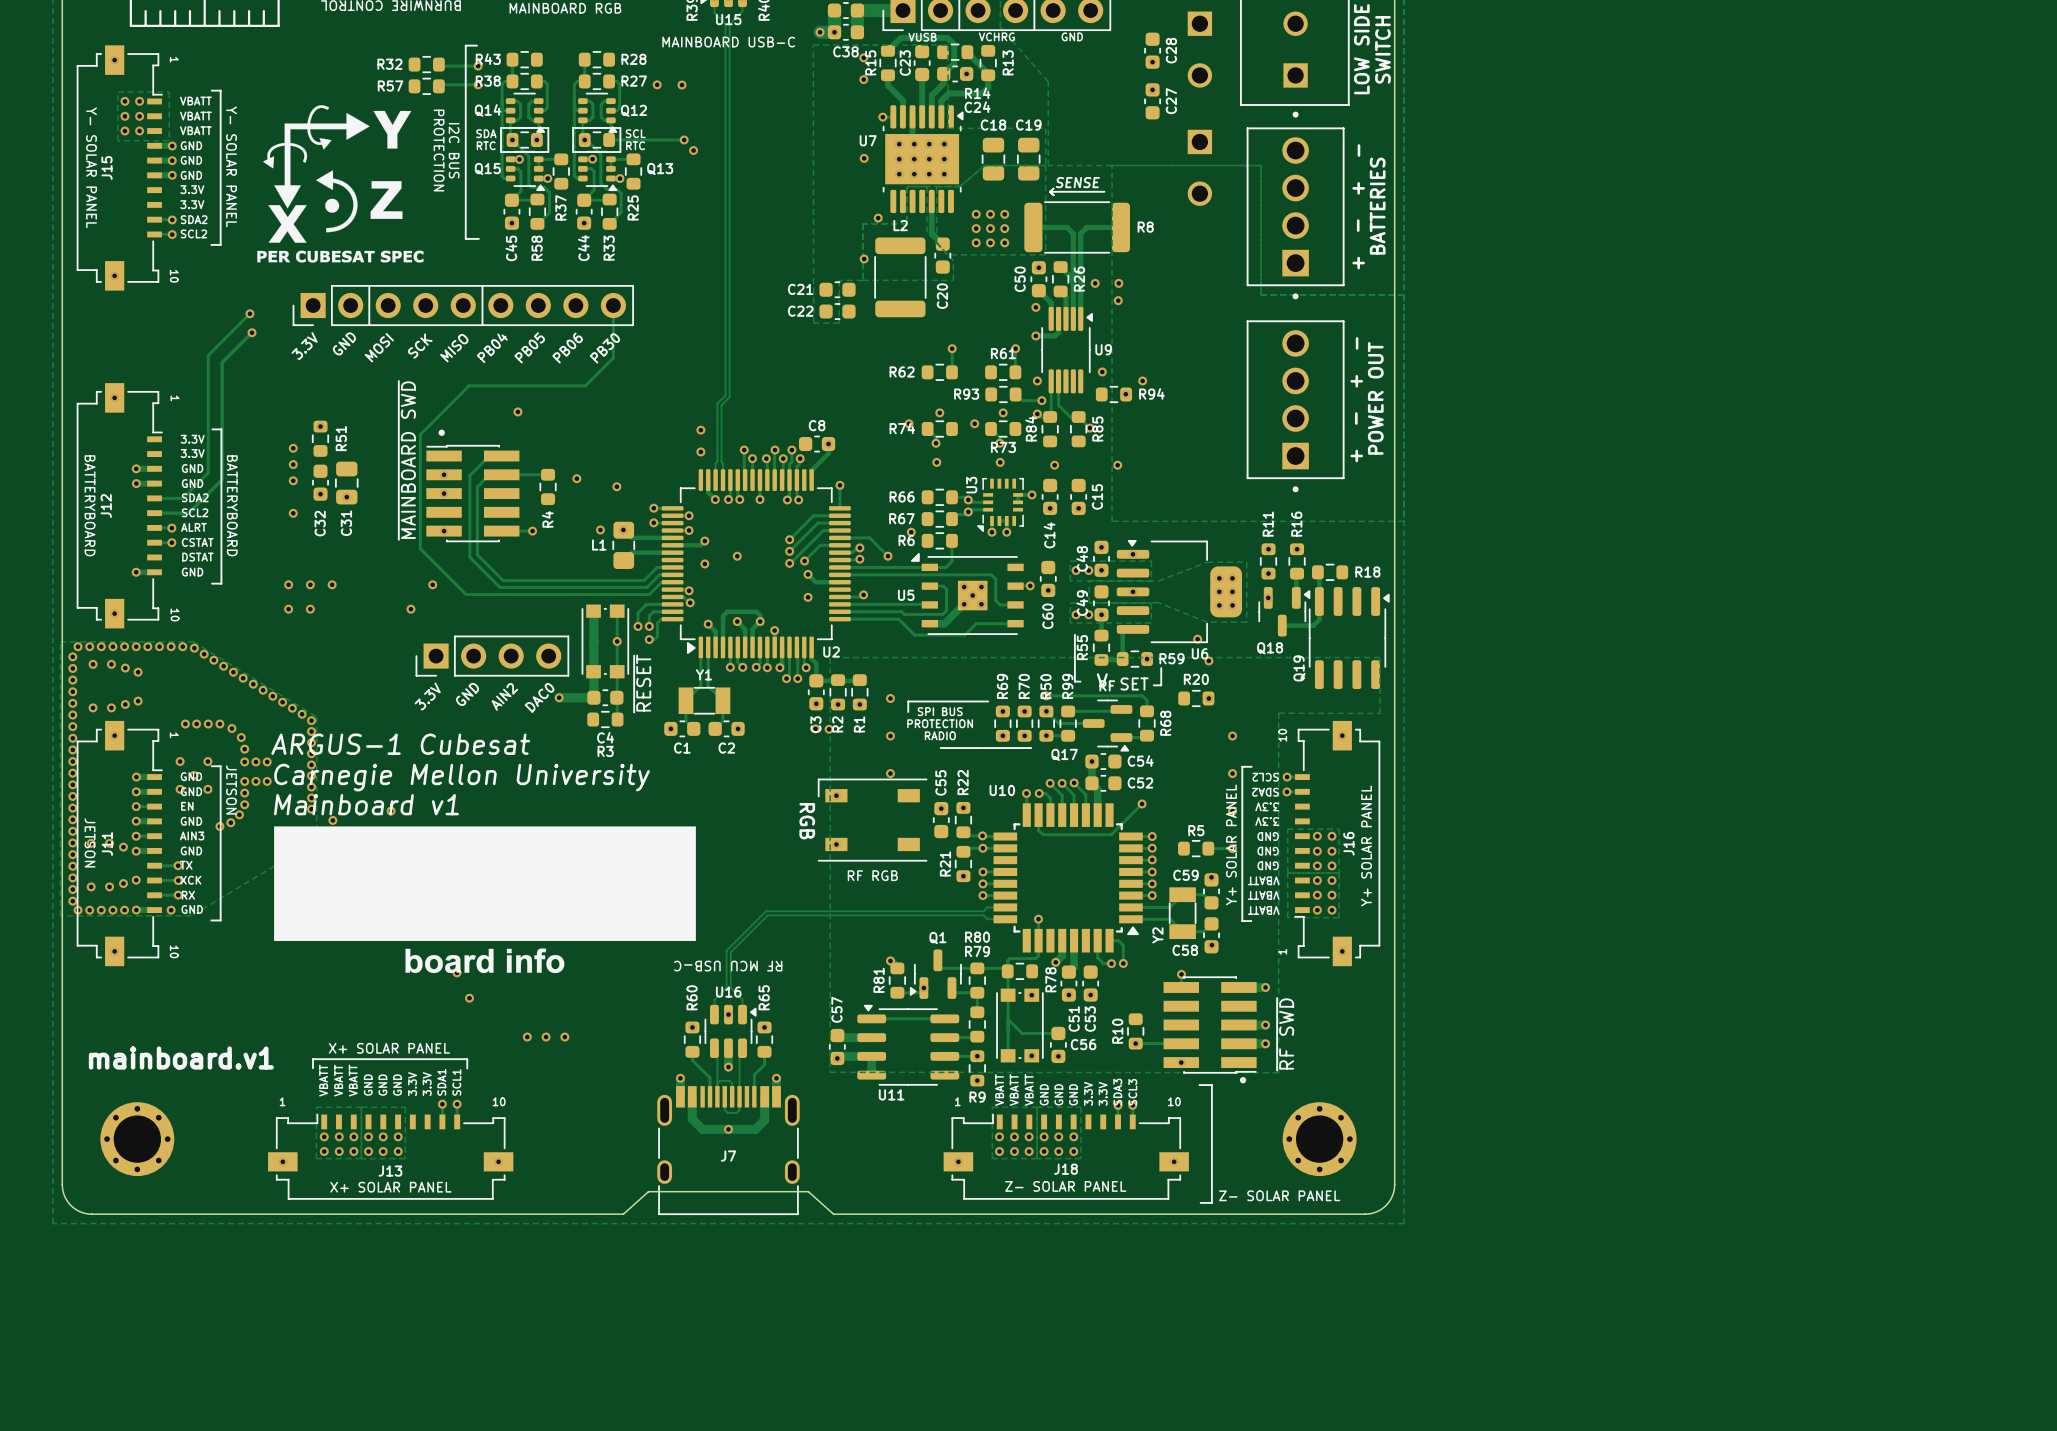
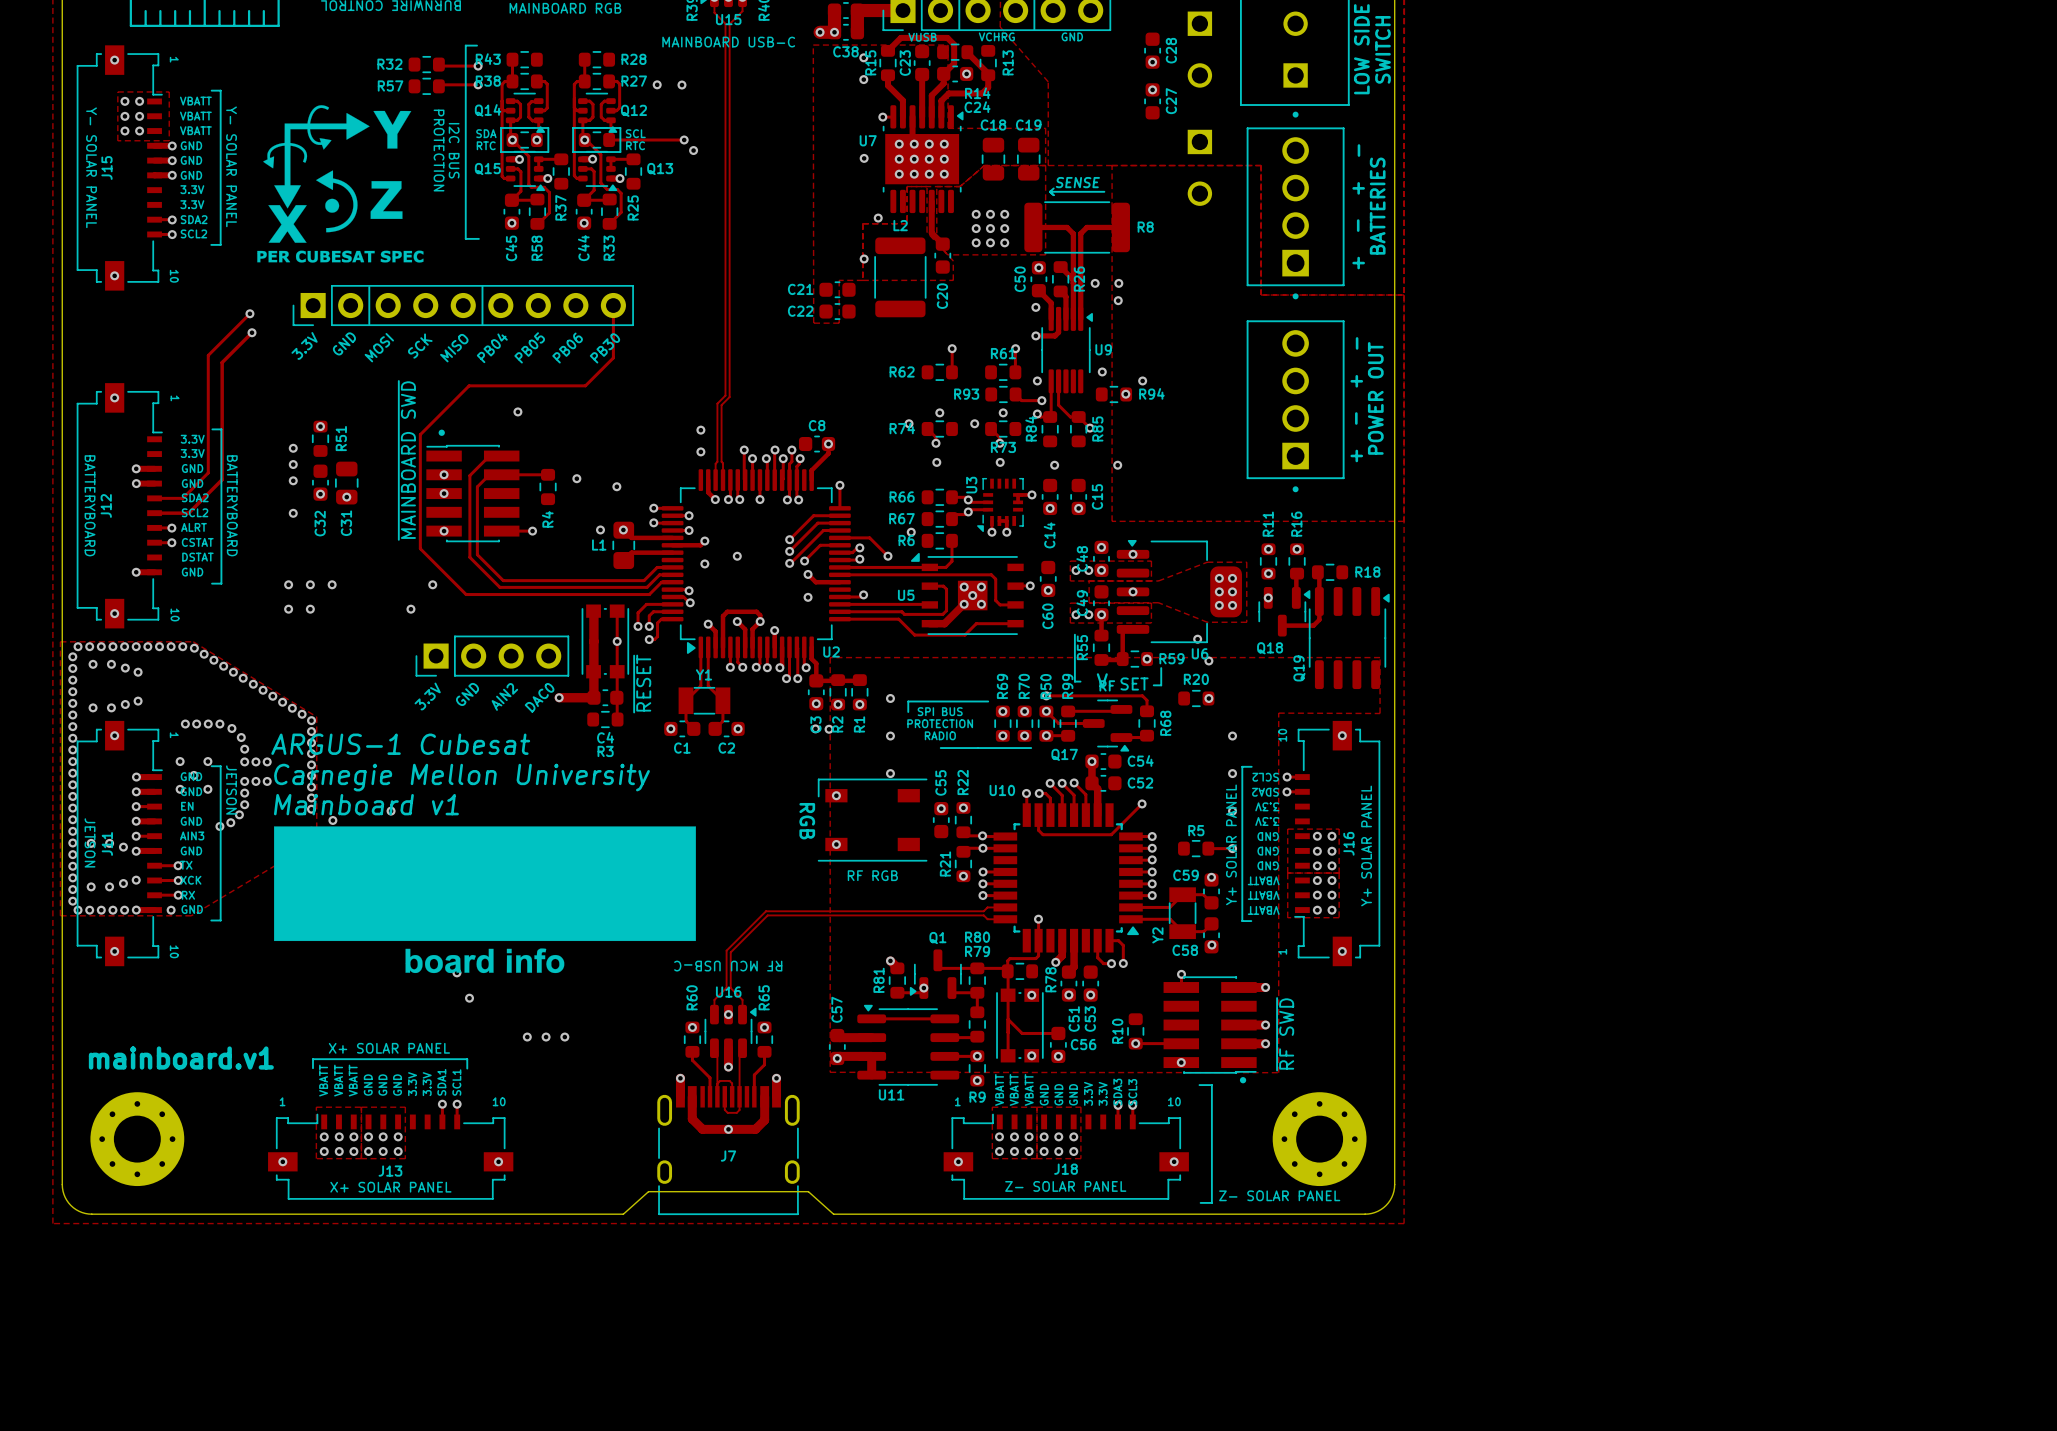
part footprint: [100, 1102, 175, 1177] -> [90, 1092, 185, 1187]
part footprint: [1282, 1102, 1357, 1177] -> [1272, 1092, 1367, 1187]

